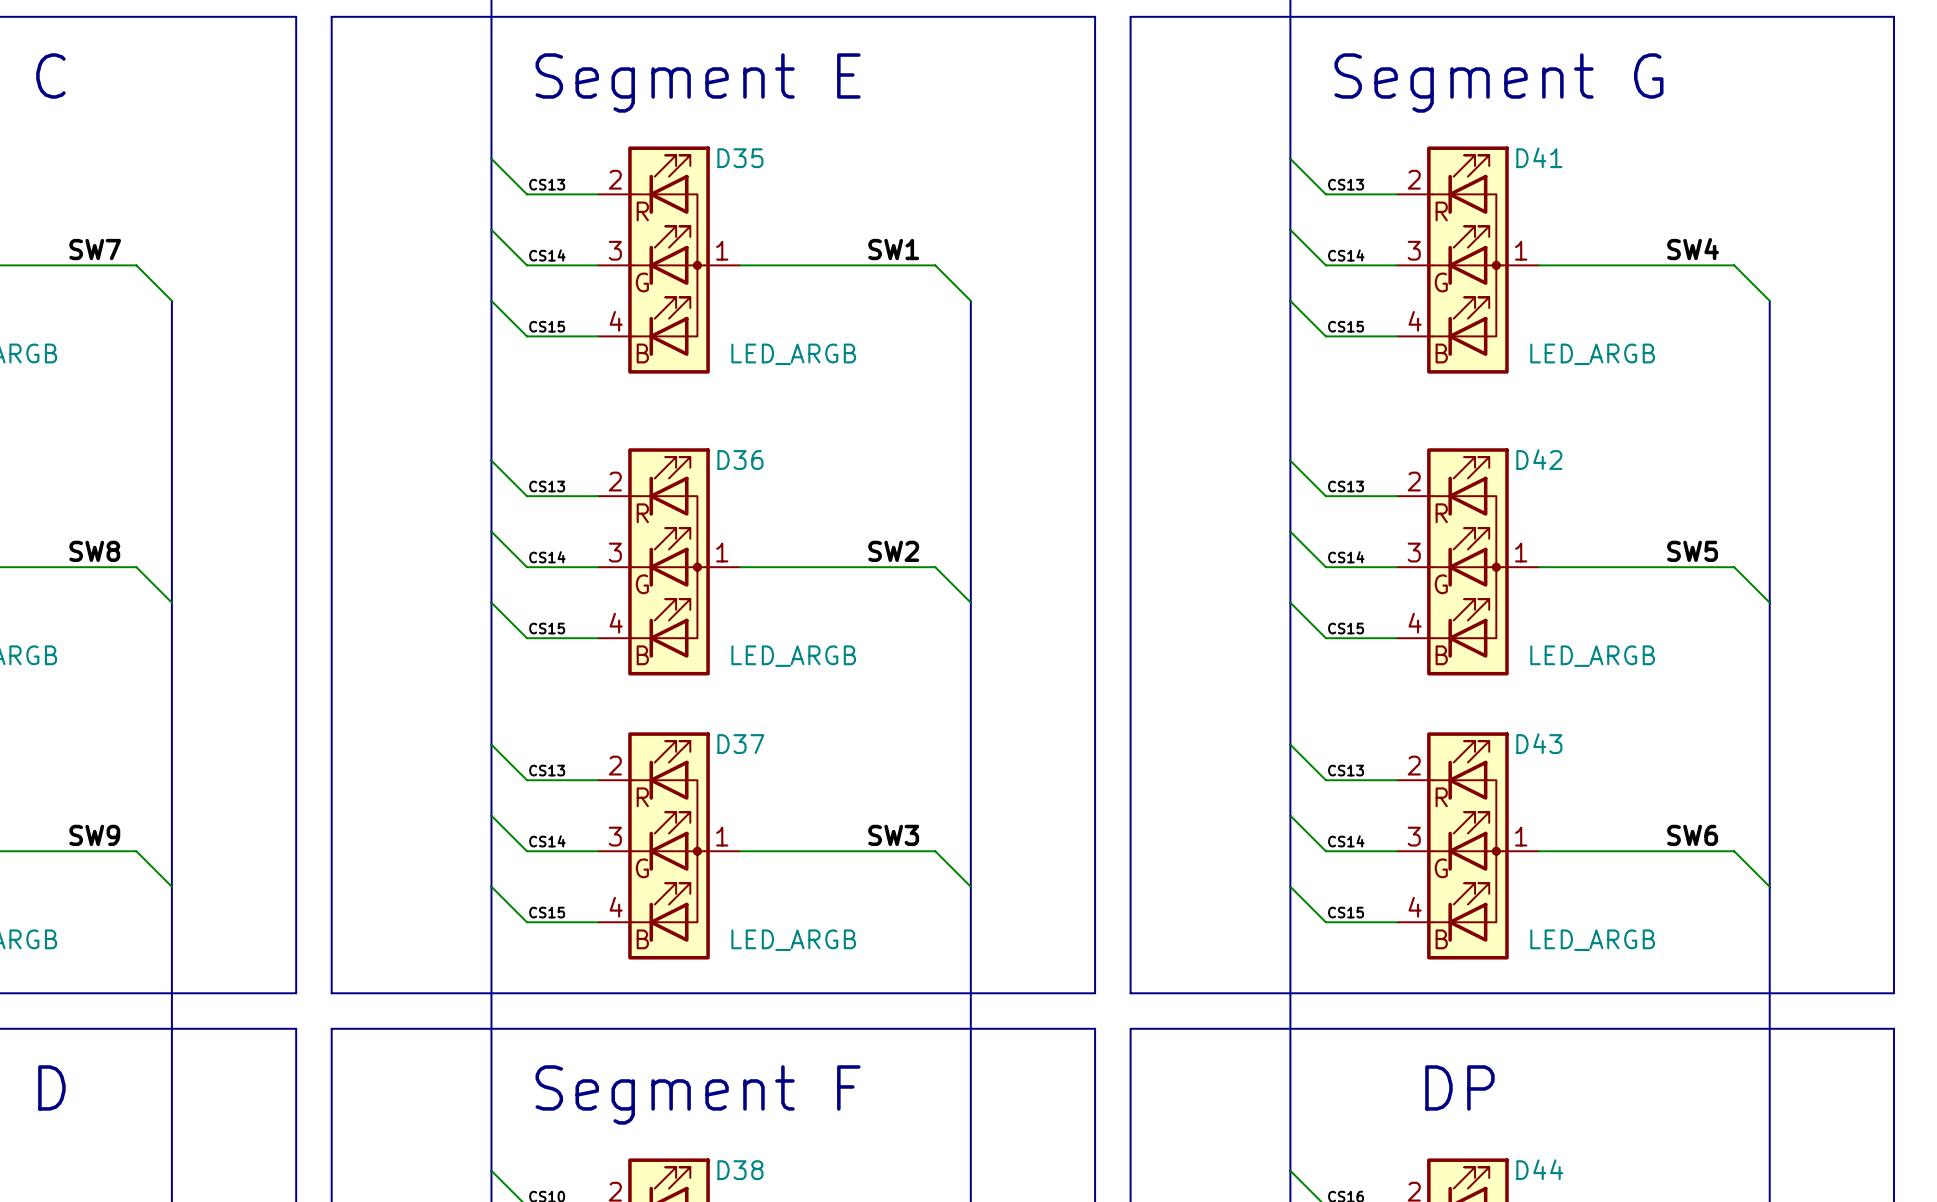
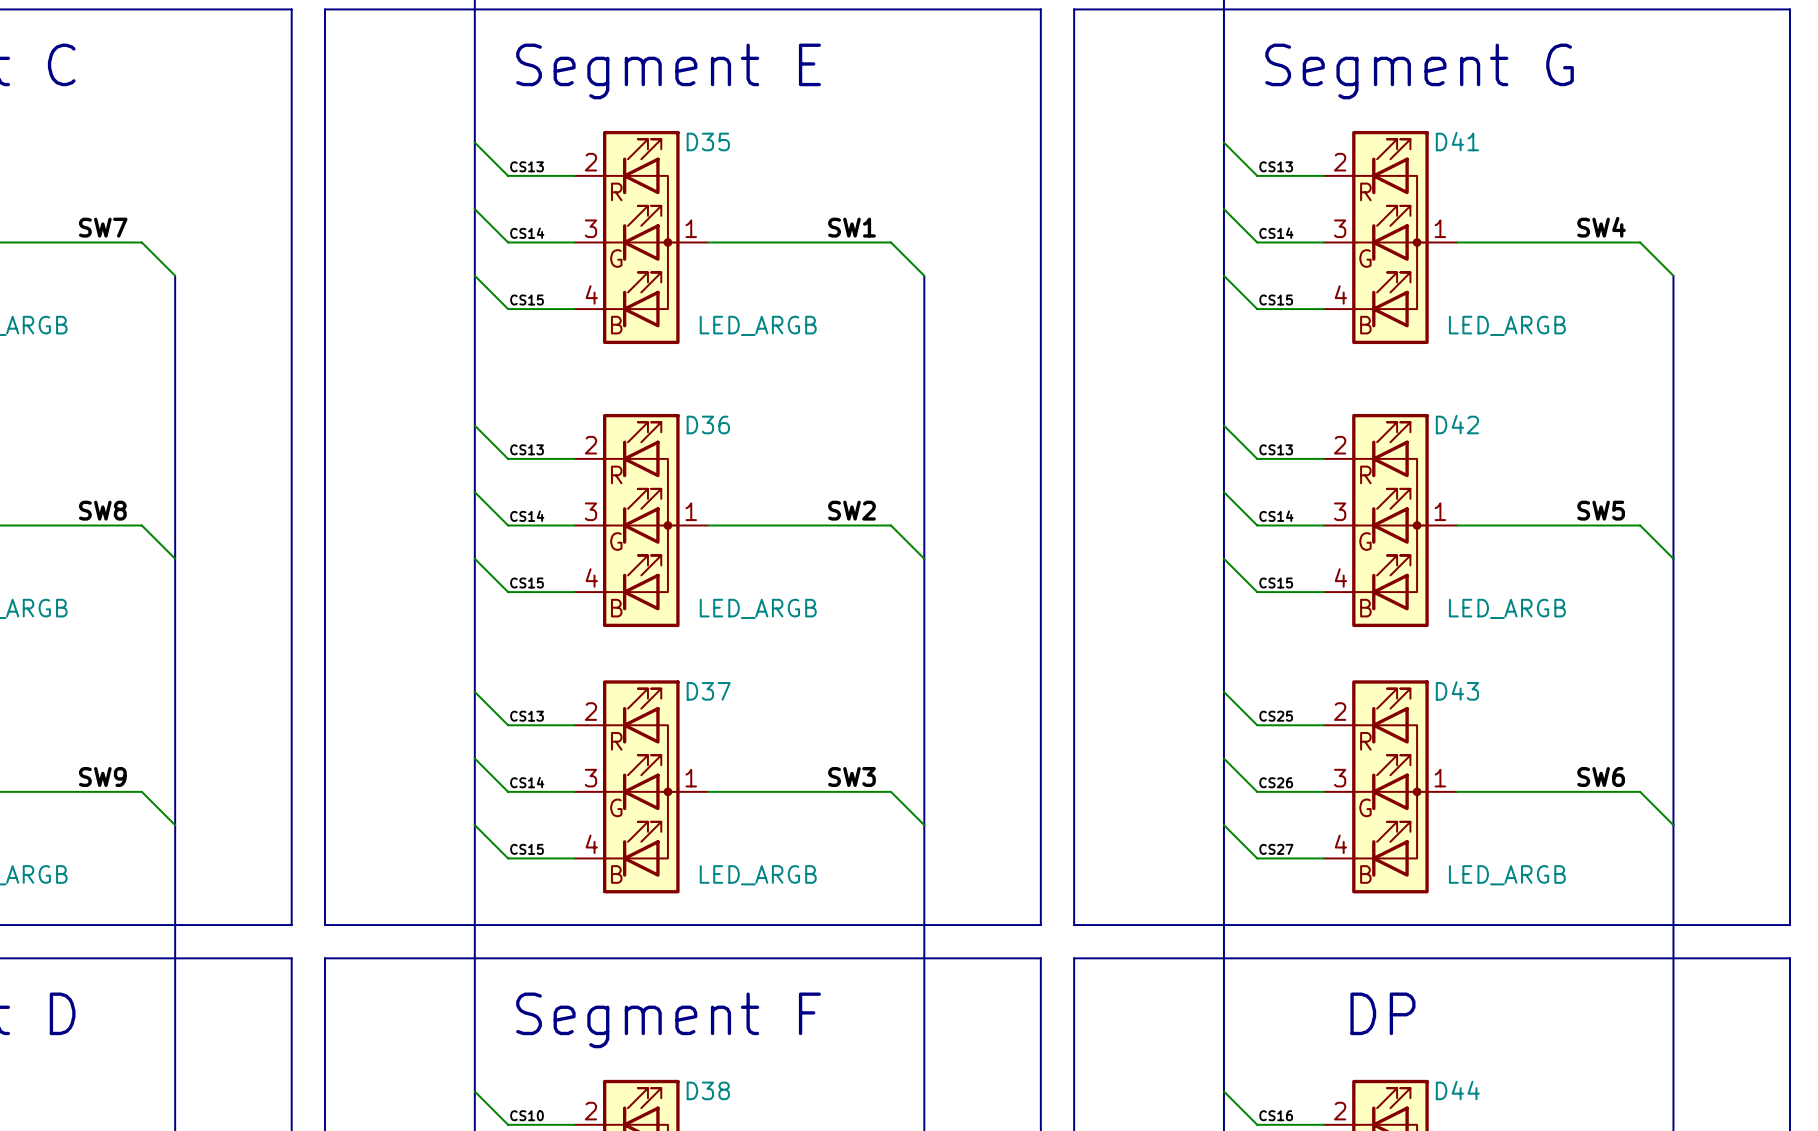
label: CS13 (1346, 770) -> CS25 (1276, 716)
label: CS14 (1346, 841) -> CS26 (1276, 782)
label: CS15 (1346, 912) -> CS27 (1276, 849)

